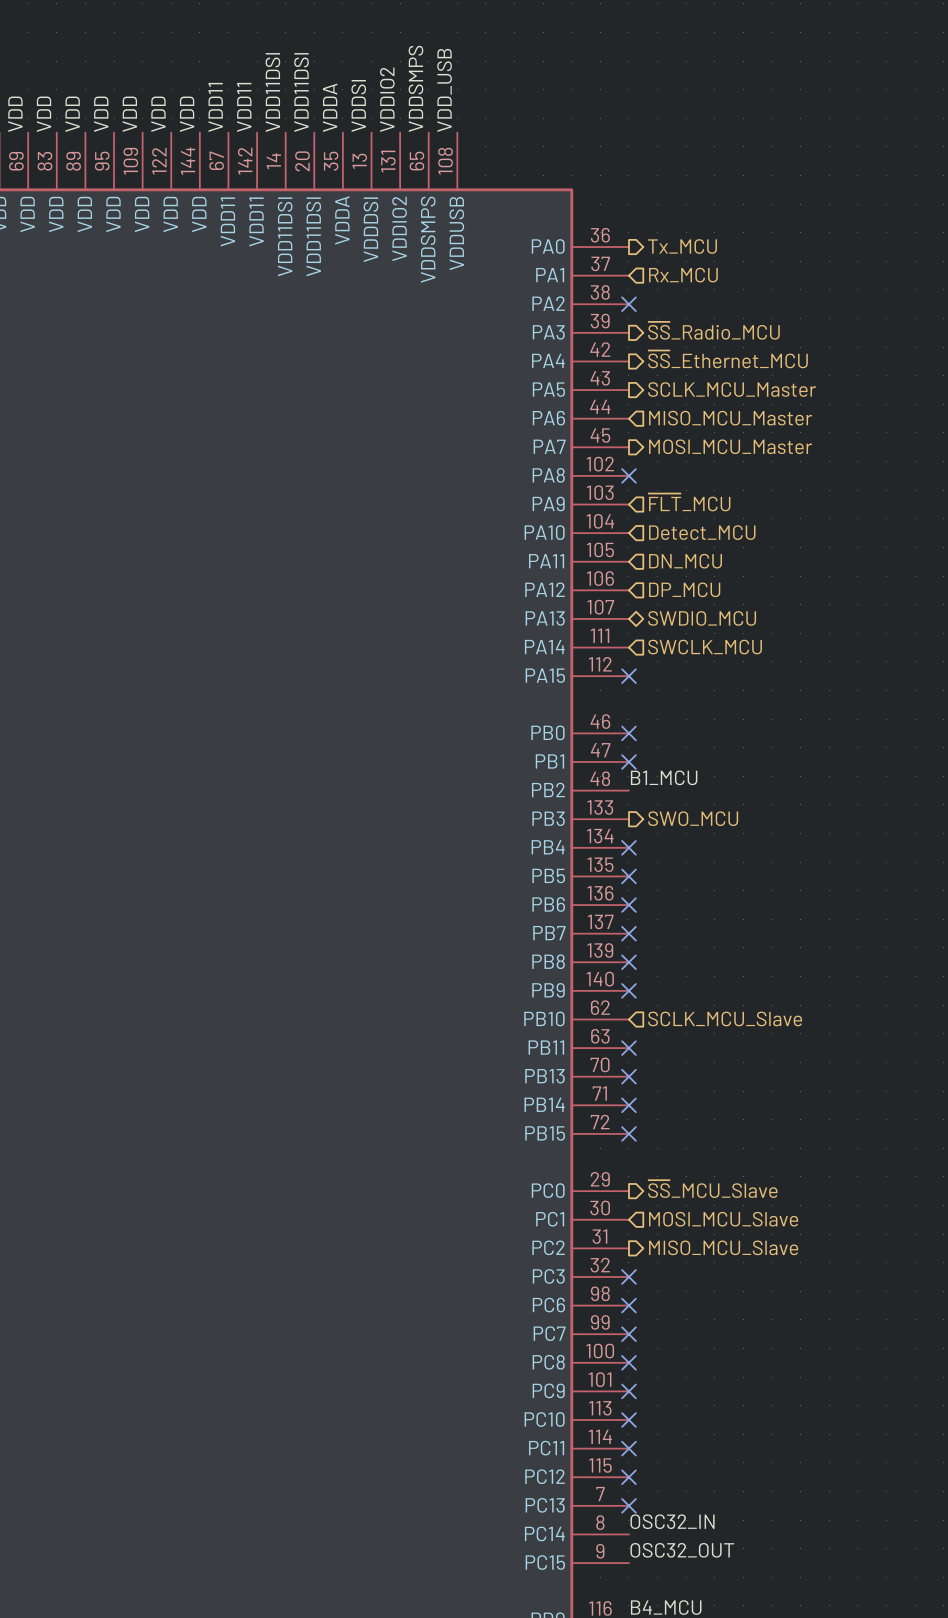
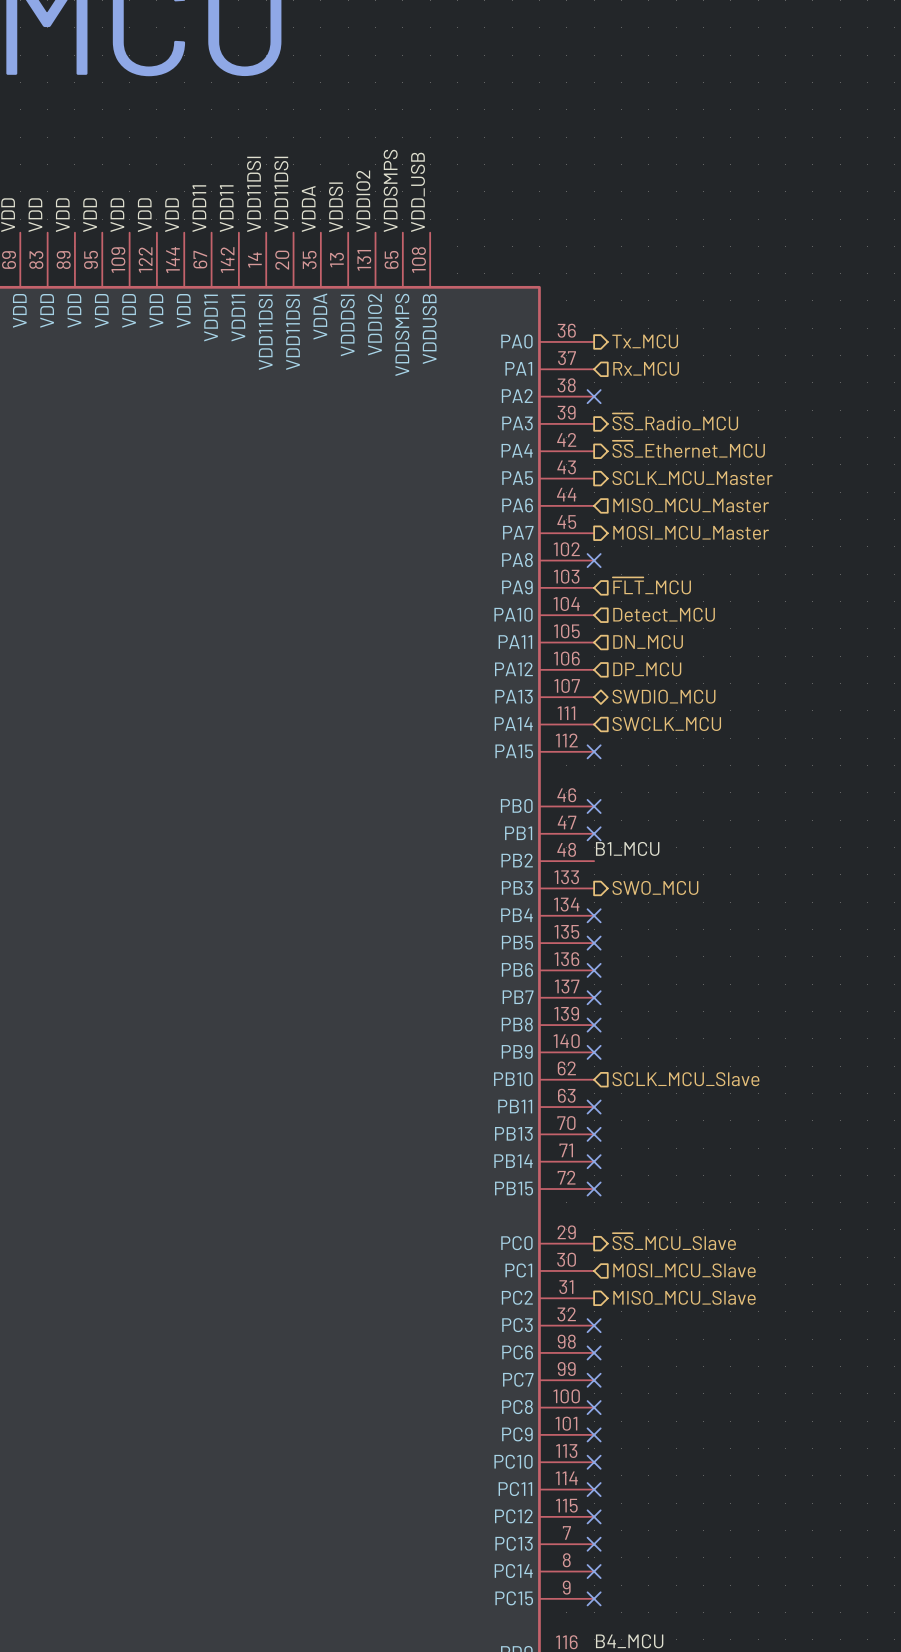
label: OSC32_IN (672, 1521) -> none
no-connect mark: none -> (594, 1571)
label: OSC32_OUT (682, 1550) -> none
no-connect mark: none -> (594, 1598)

